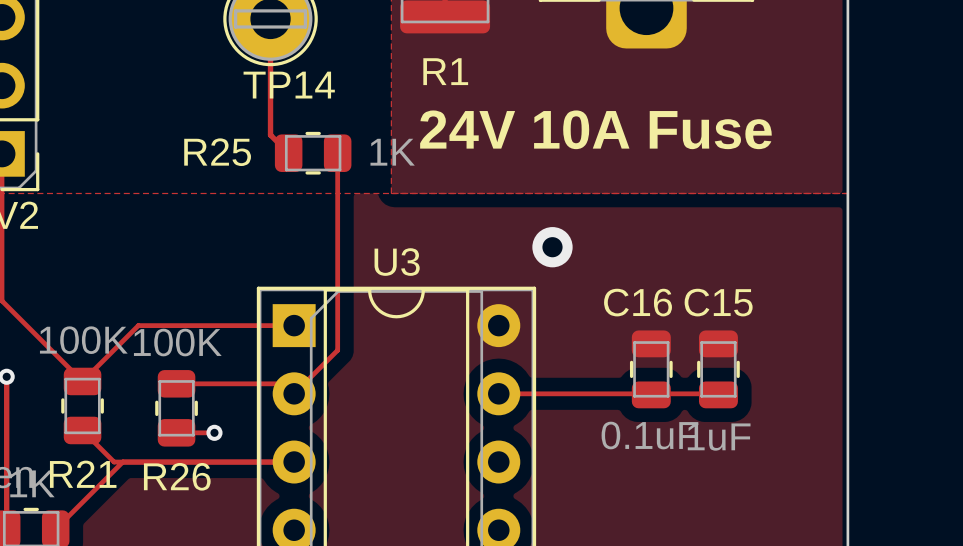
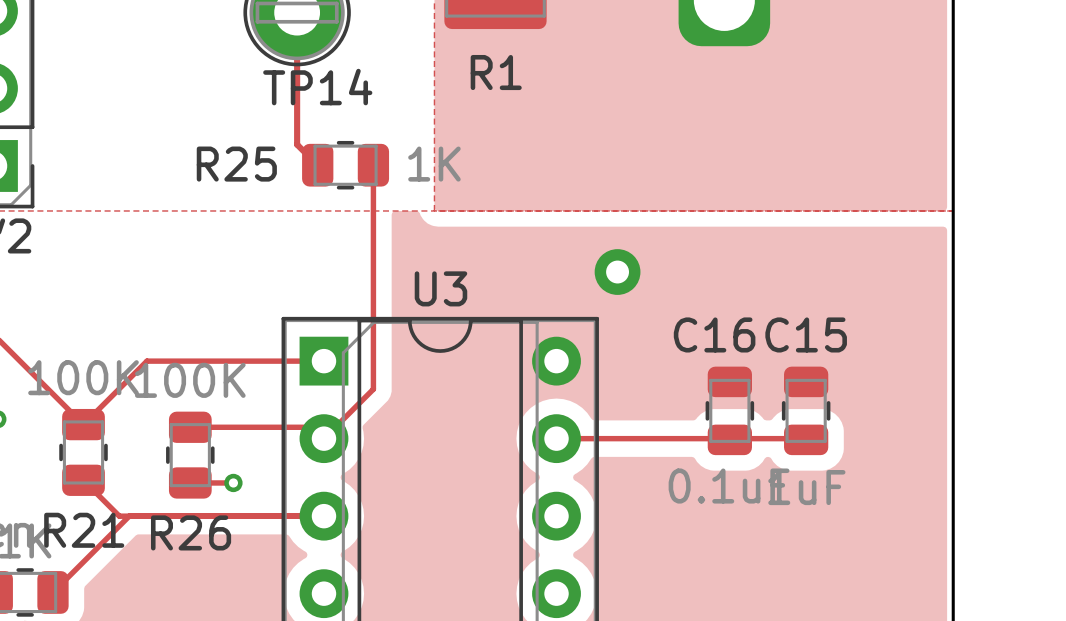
text: 24V 10A Fuse (595, 129) -> none

